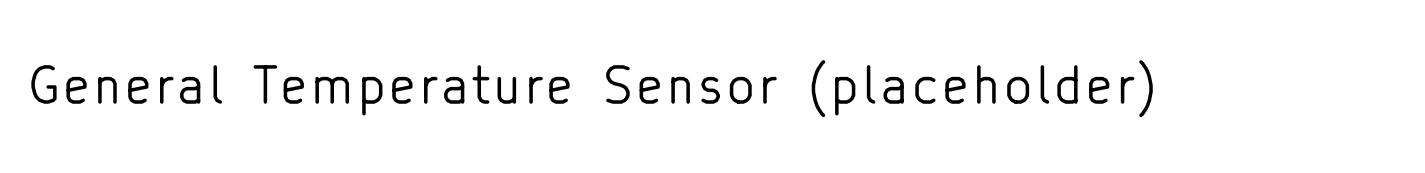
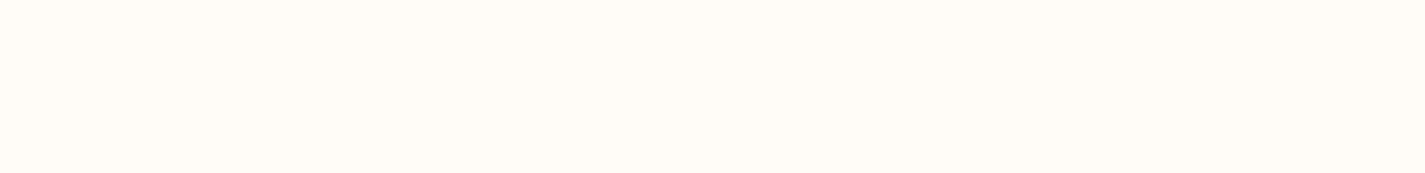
text: General Temperature Sensor (placeholder) (592, 88) -> none

